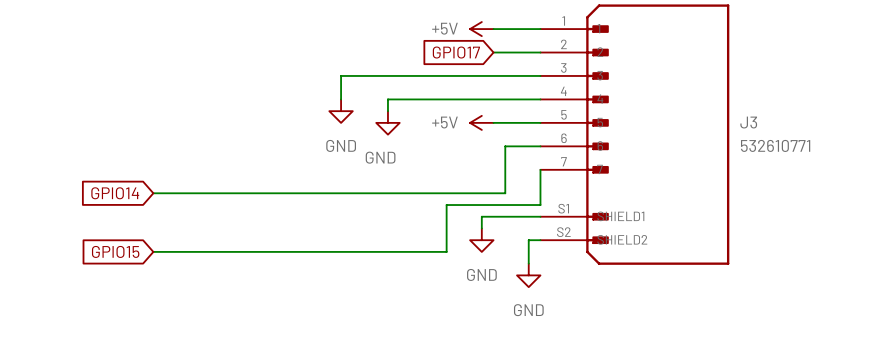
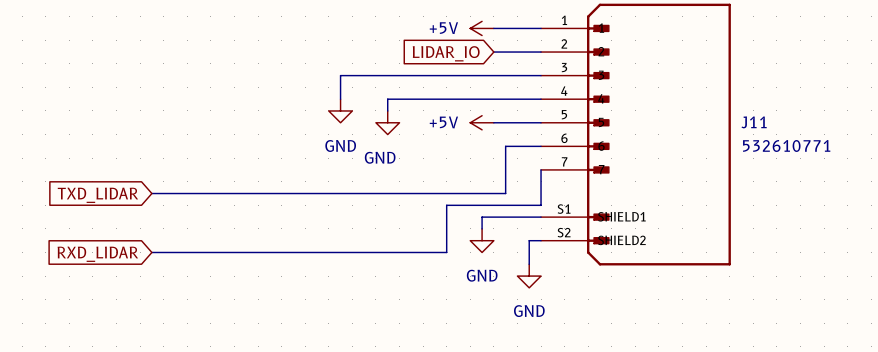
global label: GPIO17 (456, 52) -> LIDAR_IO (446, 53)
J3 name: J3 (748, 122) -> J11 (754, 122)
global label: GPIO14 (115, 193) -> TXD_LIDAR (97, 195)
global label: GPIO15 (115, 251) -> RXD_LIDAR (97, 254)

